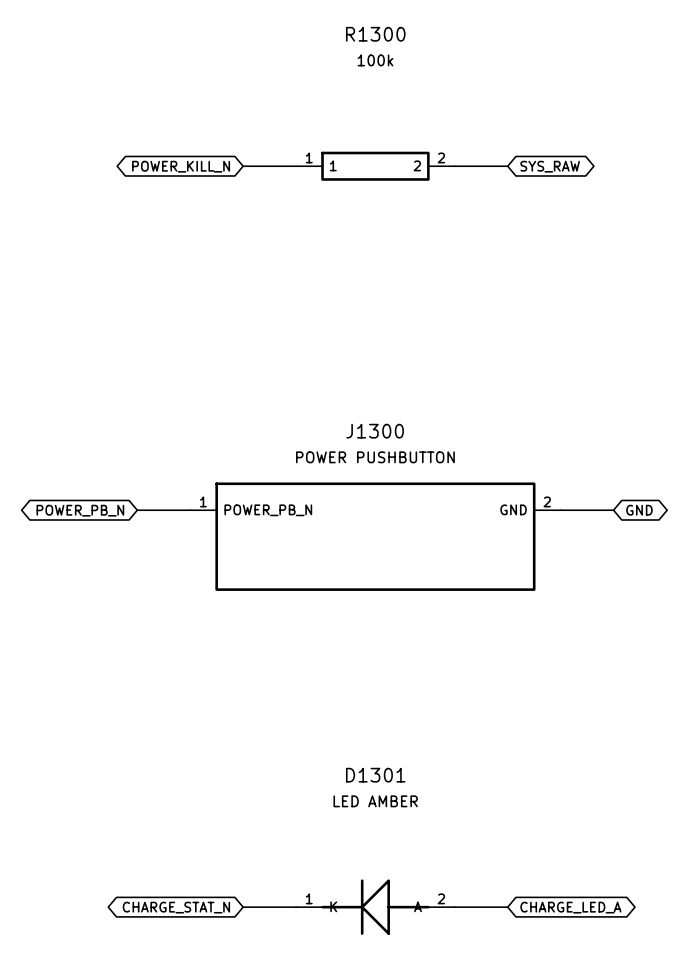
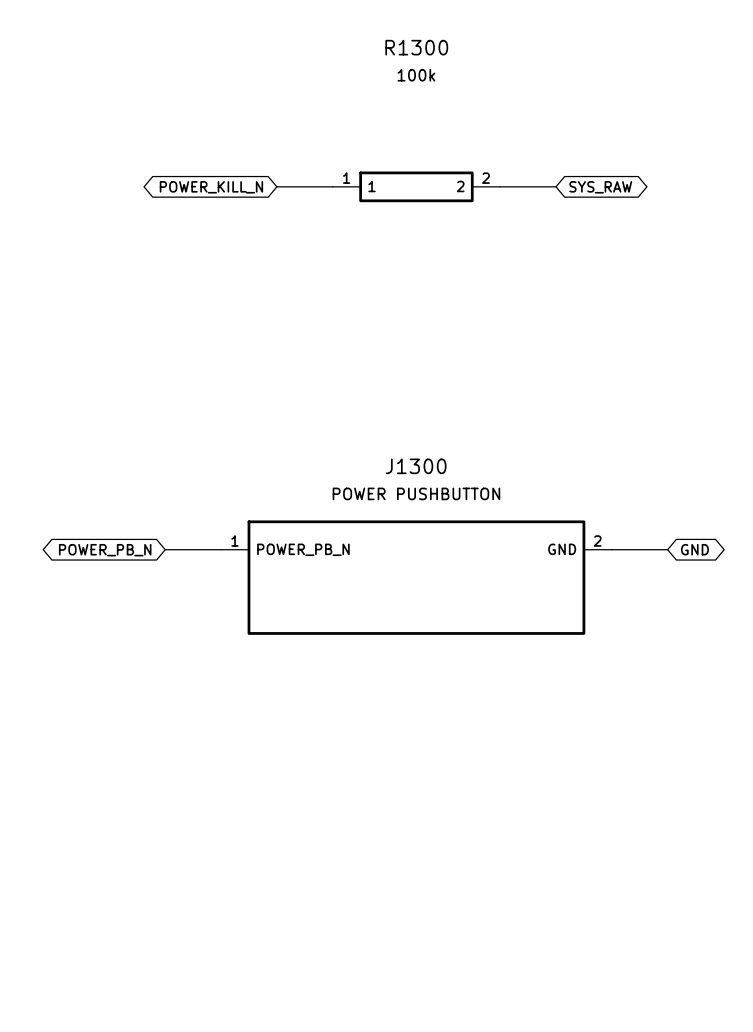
global label: CHARGE_STAT_N (176, 907) -> none
wire: (243, 907) (296, 907) -> none
D1301: LED AMBER (375, 907) -> none
wire: (454, 907) (507, 907) -> none
global label: CHARGE_LED_A (570, 907) -> none

